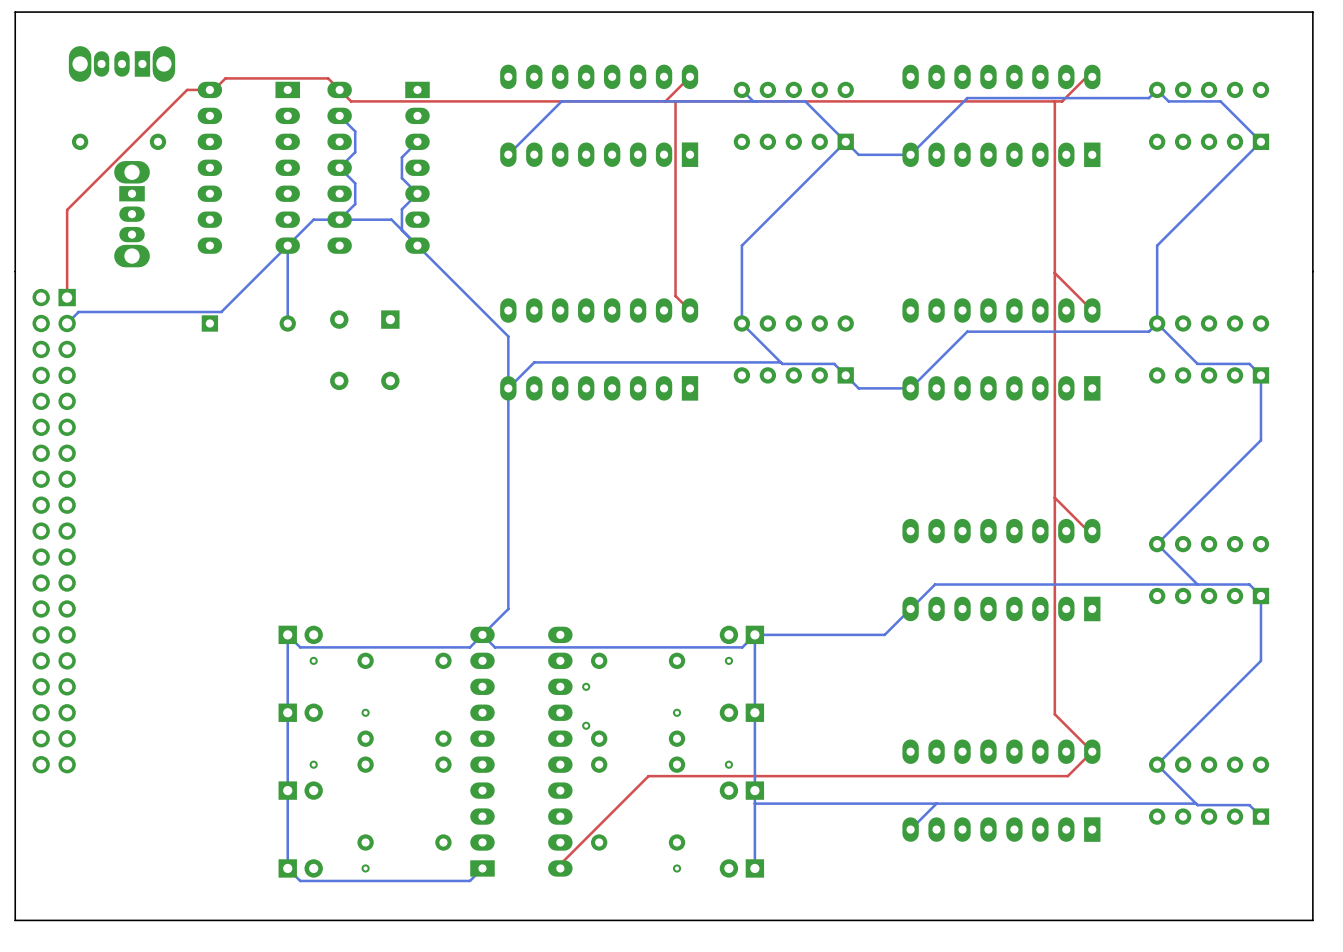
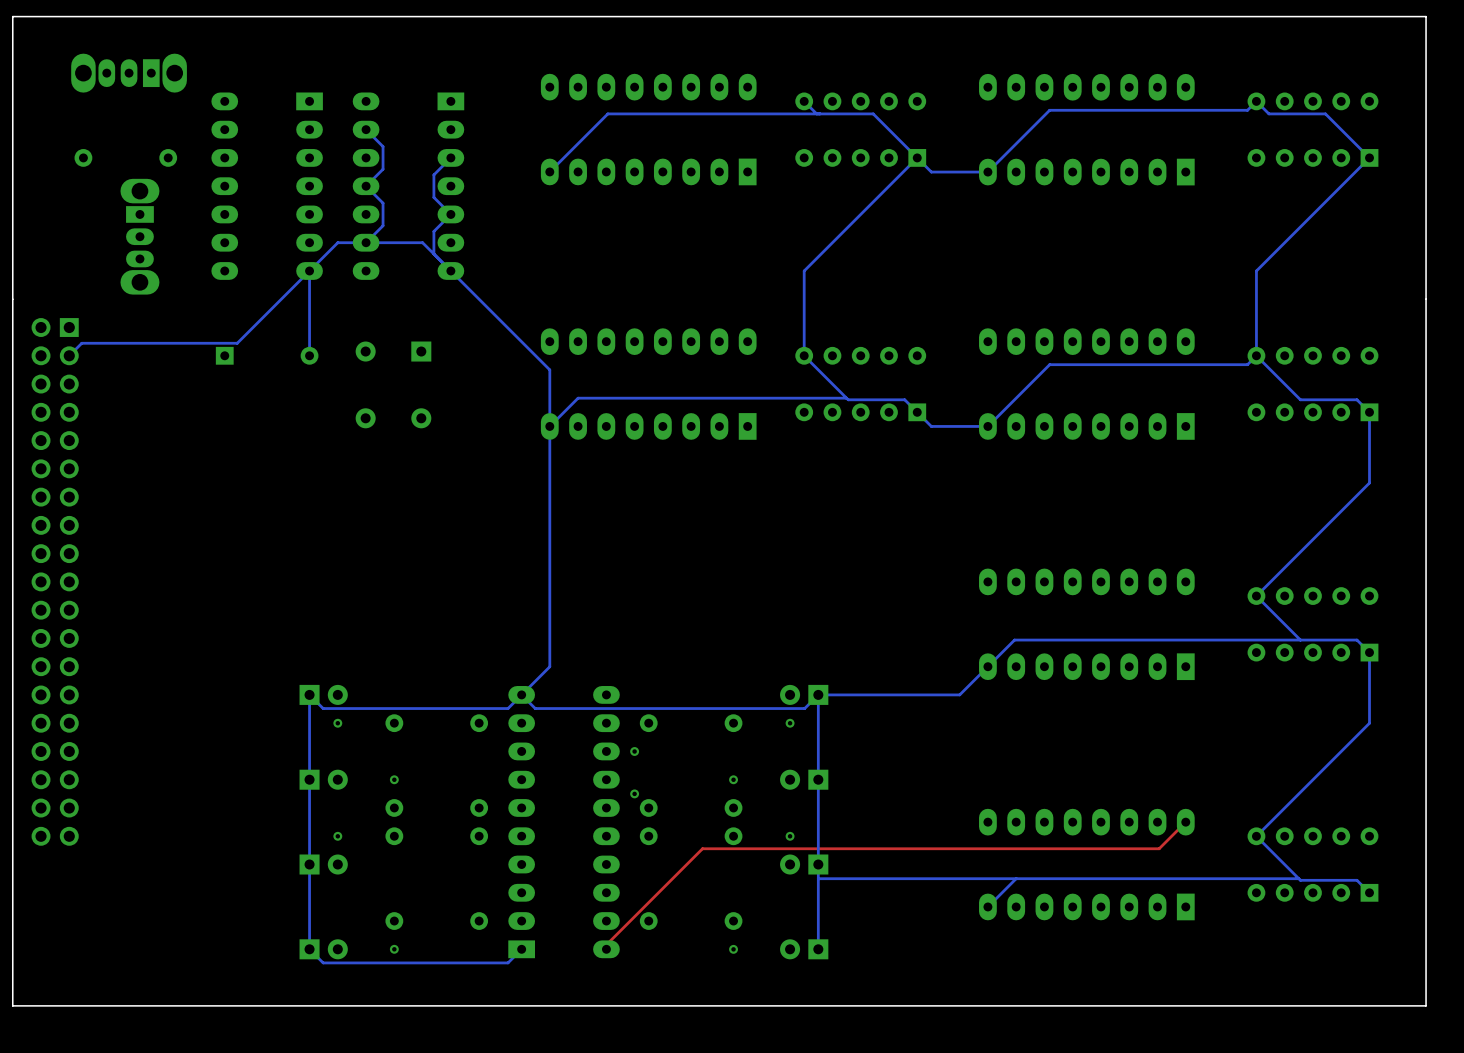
top track: (690, 76) (665, 101) -> none
top track: (1092, 76) (1086, 76) (1062, 101) (351, 101) (328, 78) (225, 78) (213, 89) (187, 89) (67, 209) (67, 297) -> none
top track: (675, 101) (675, 296) (690, 310) -> none
top track: (1054, 101) (1054, 714) (1092, 751) -> none
top track: (1054, 273) (1092, 310) -> none
top track: (1054, 497) (1088, 531) (1092, 531) -> none

